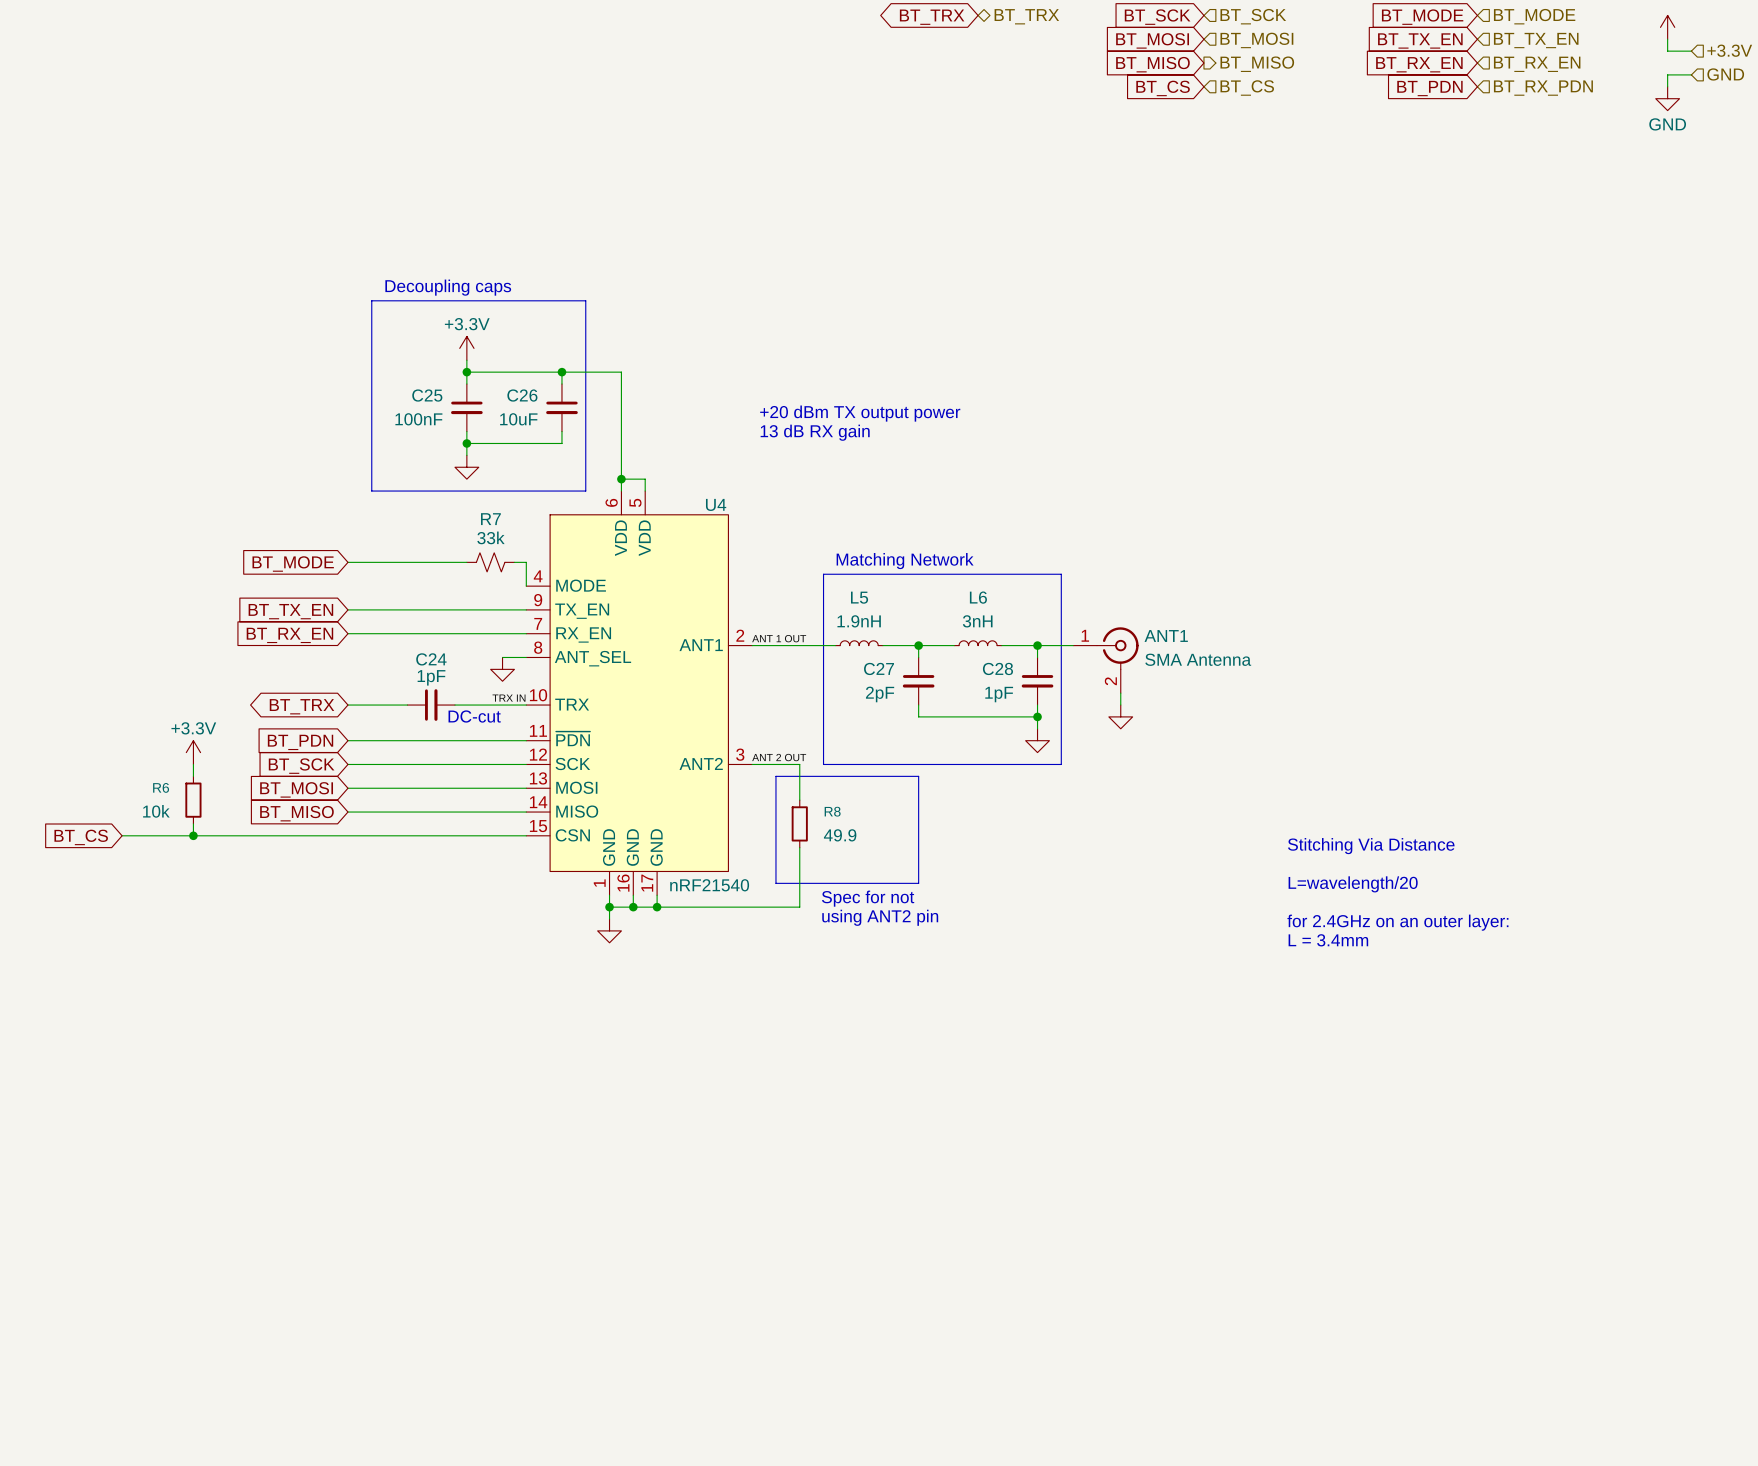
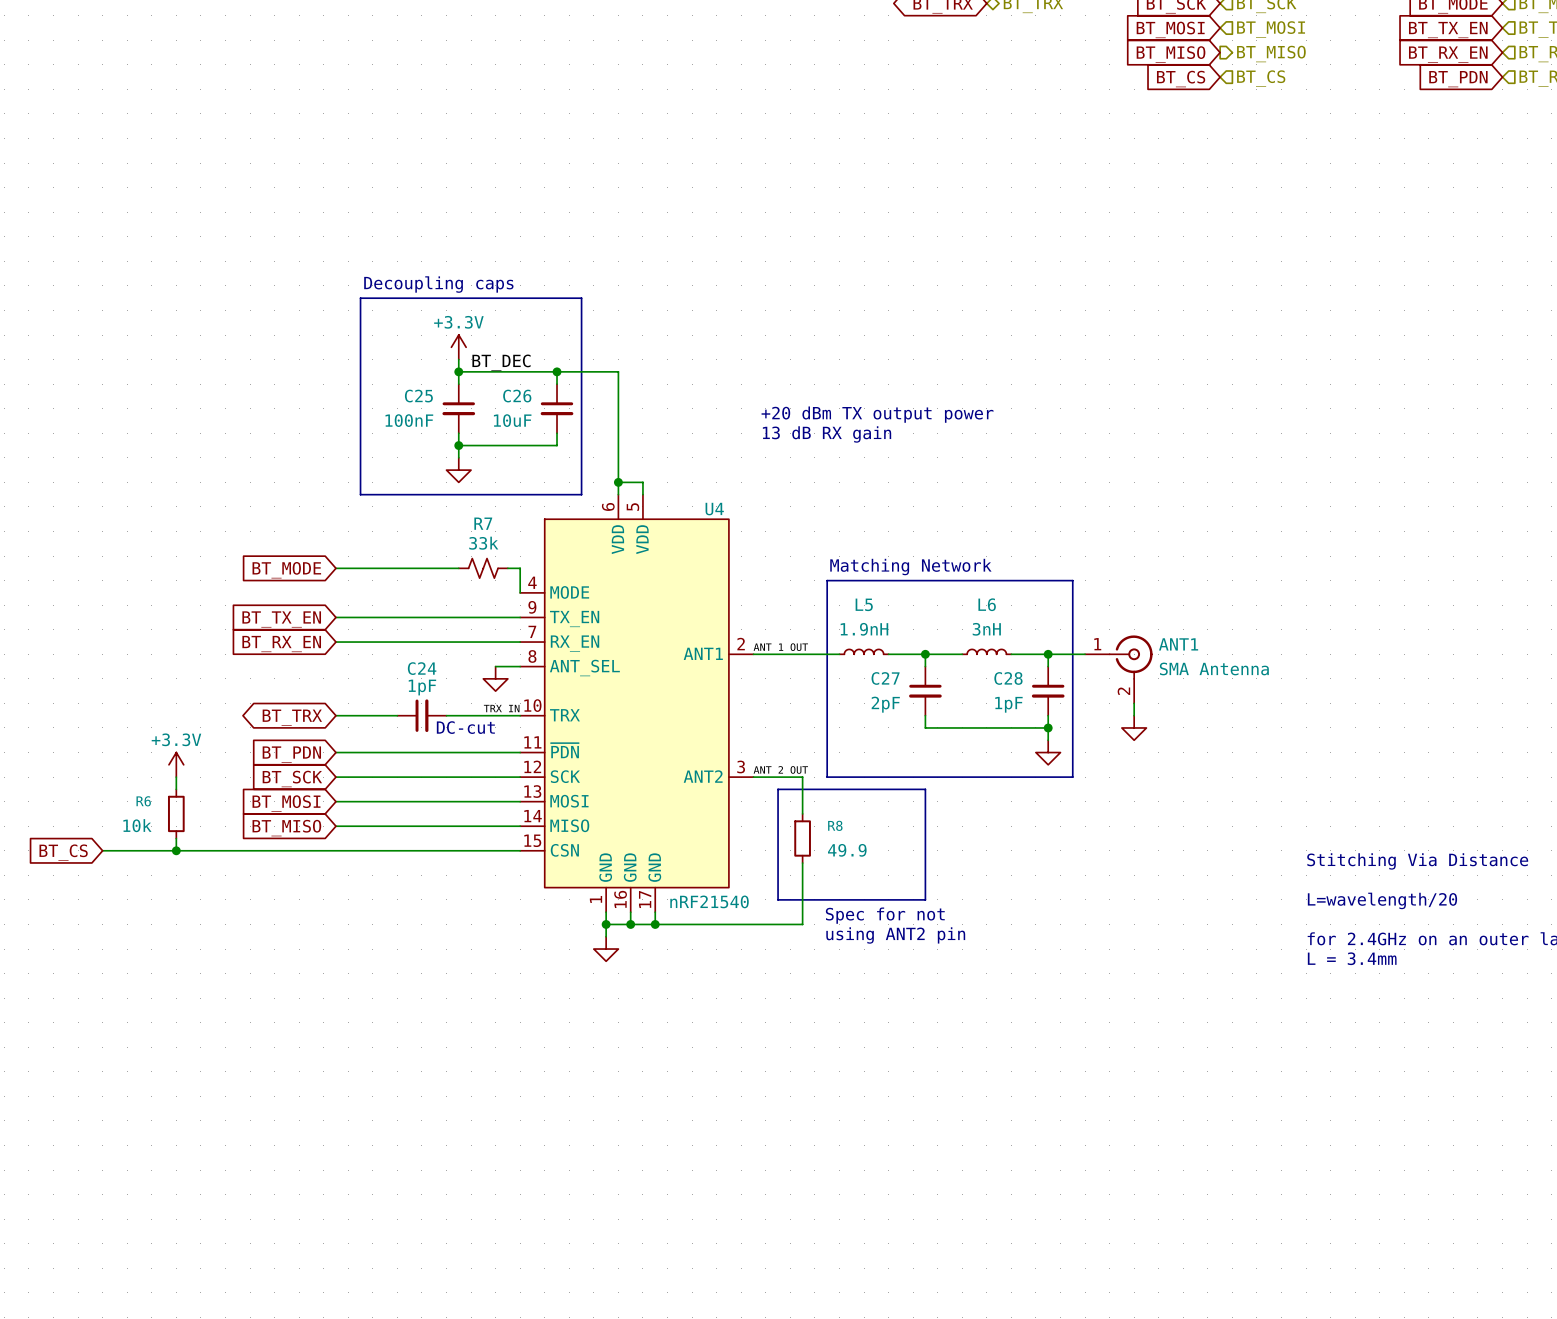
label: none -> BT_DEC (501, 362)

